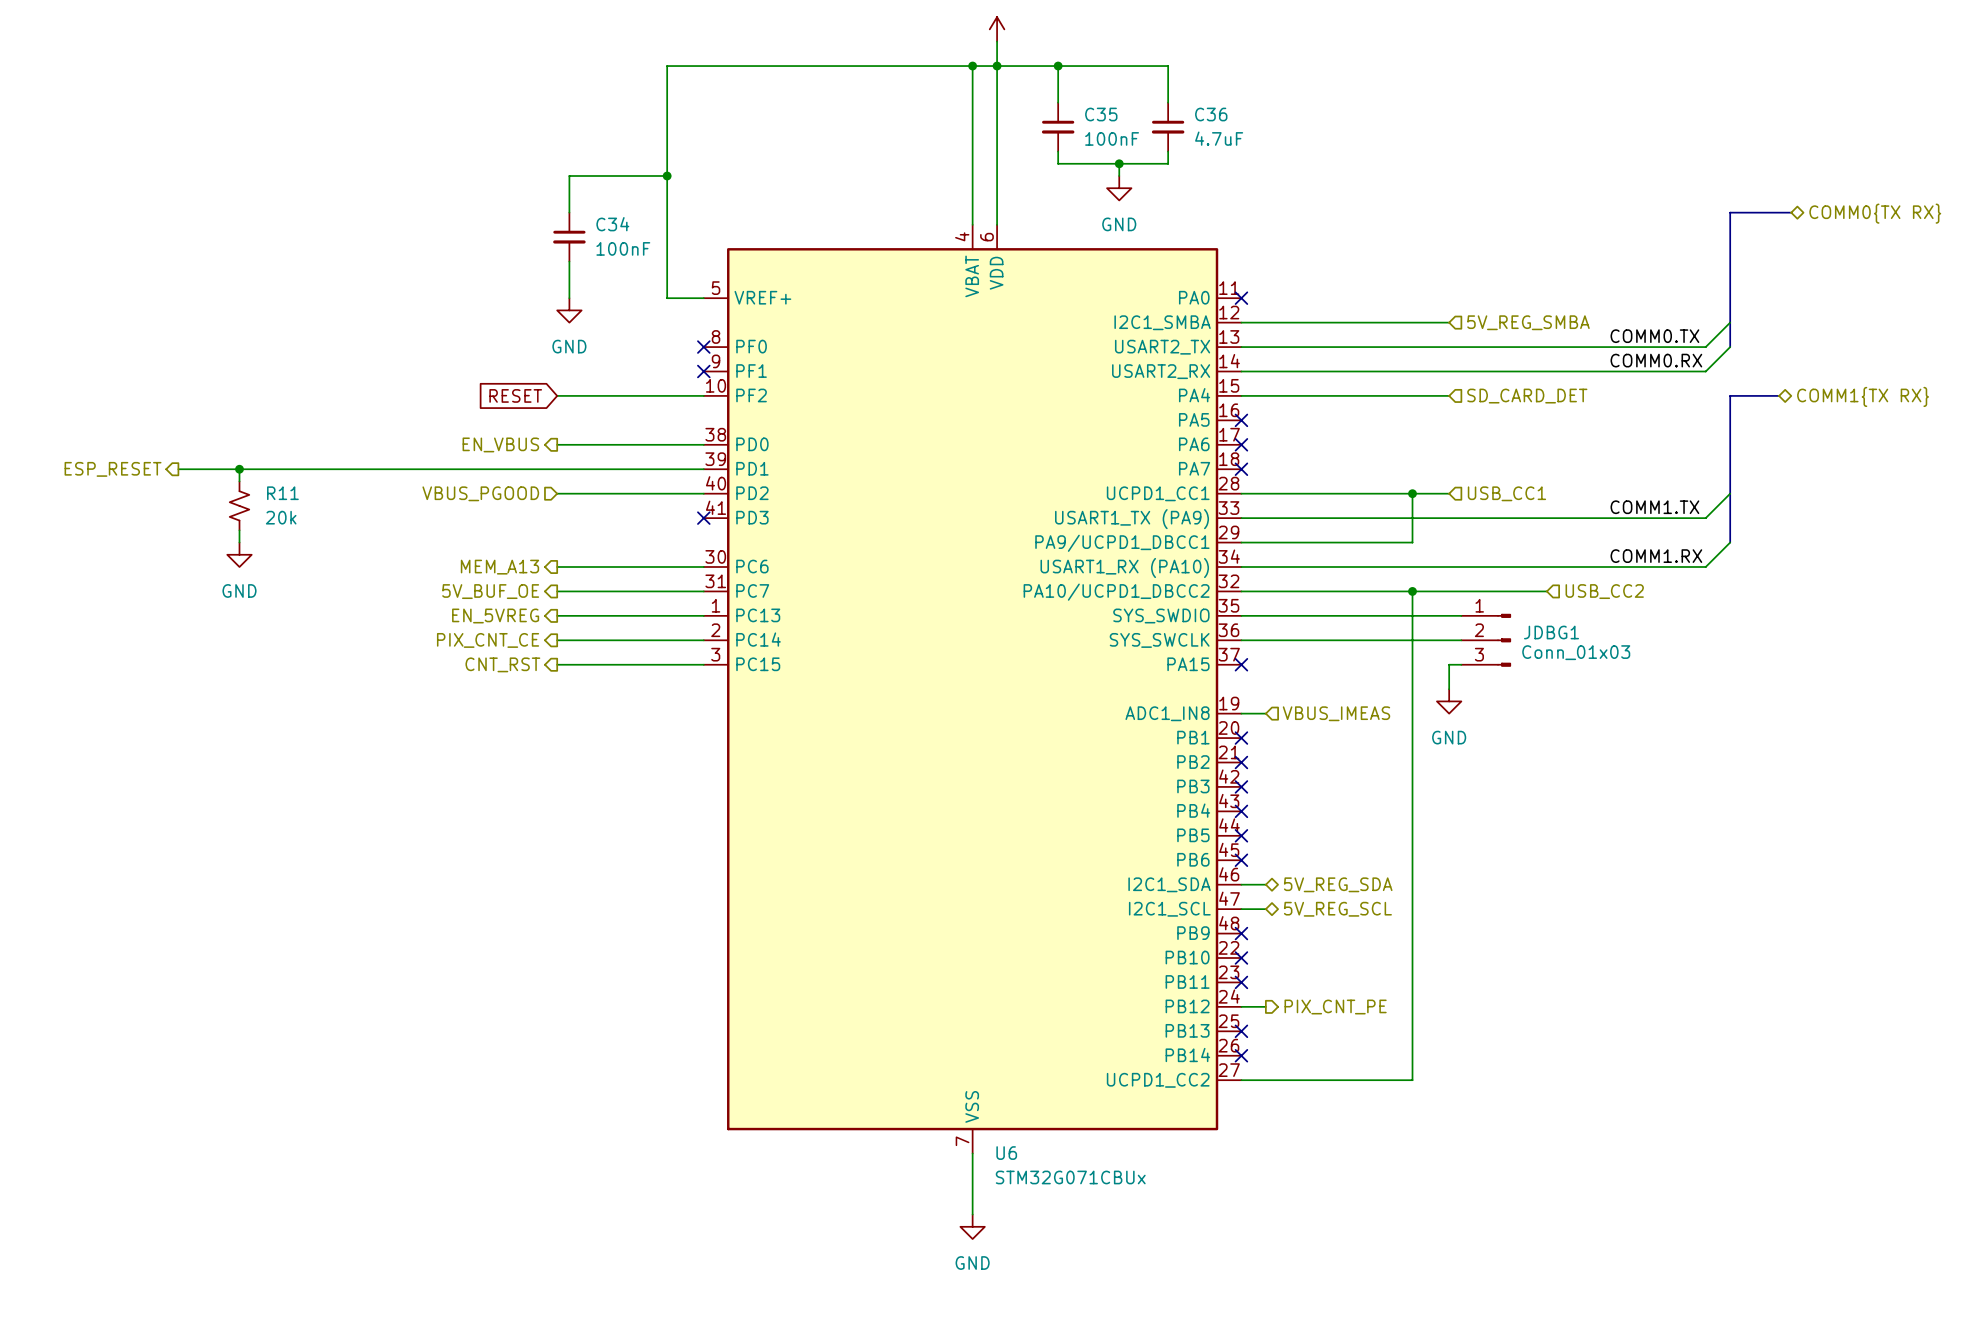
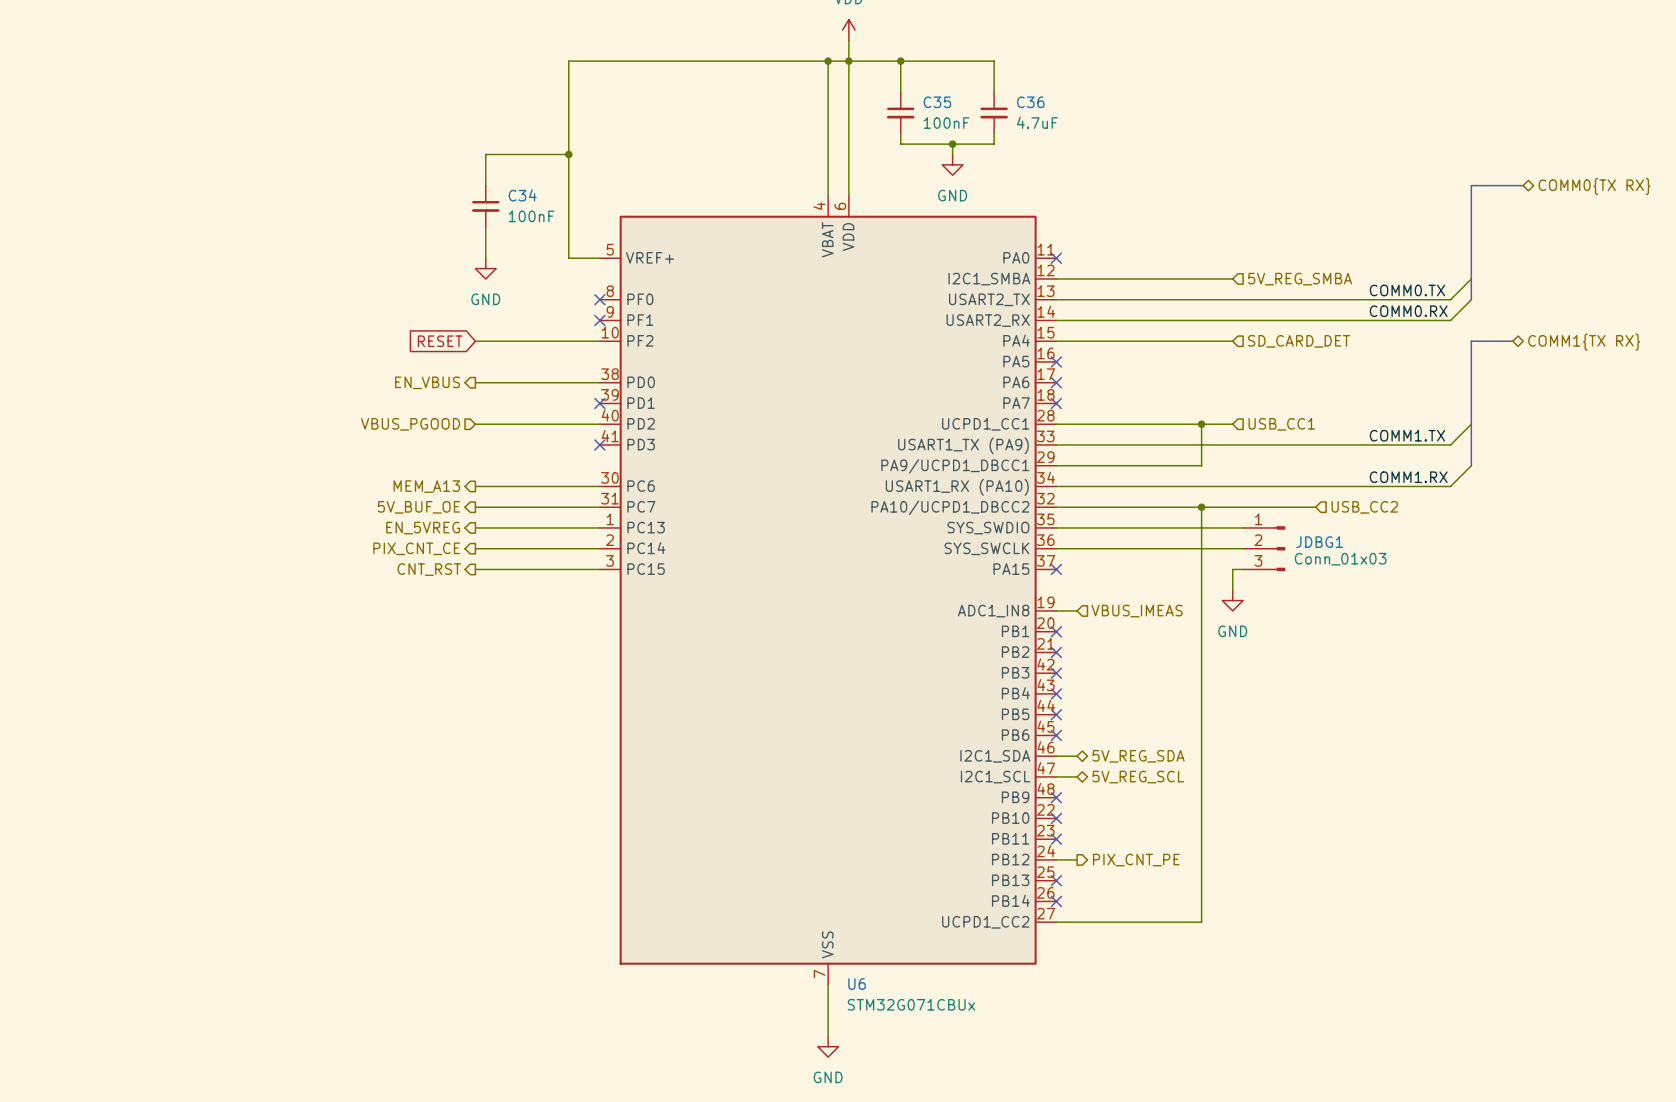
hierarchical label: ESP_RESET (113, 469) -> none
wire: (178, 469) (703, 469) -> none
wire: (239, 469) (239, 481) -> none
junction: (239, 469) -> none
no-connect mark: none -> (599, 403)
R11: 20k (239, 505) -> none
wire: (239, 530) (239, 542) -> none
power symbol: GND (239, 554) -> none

